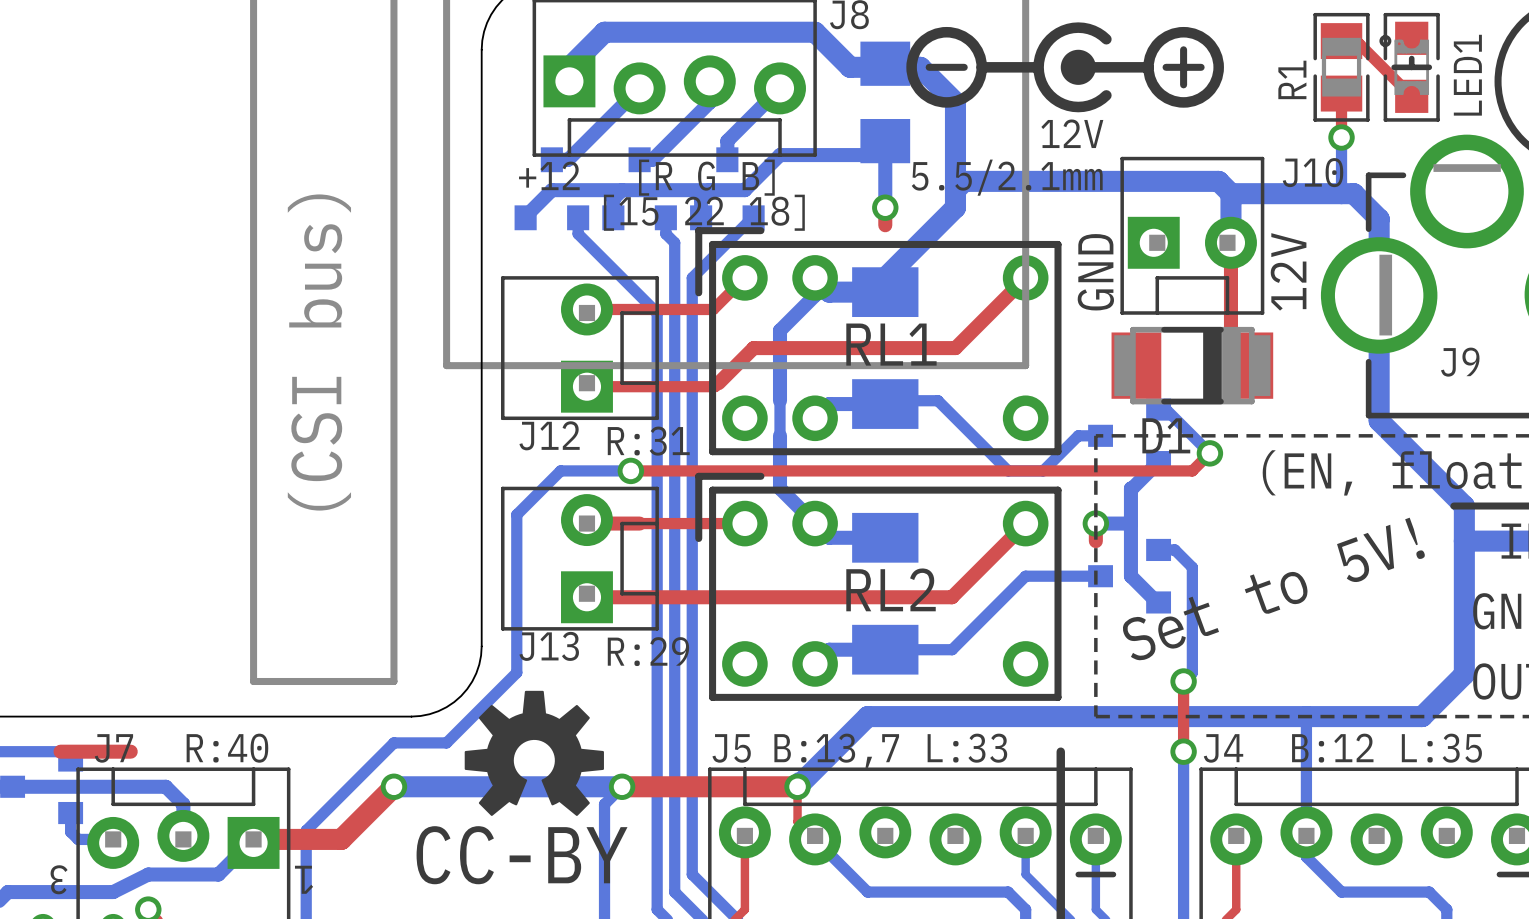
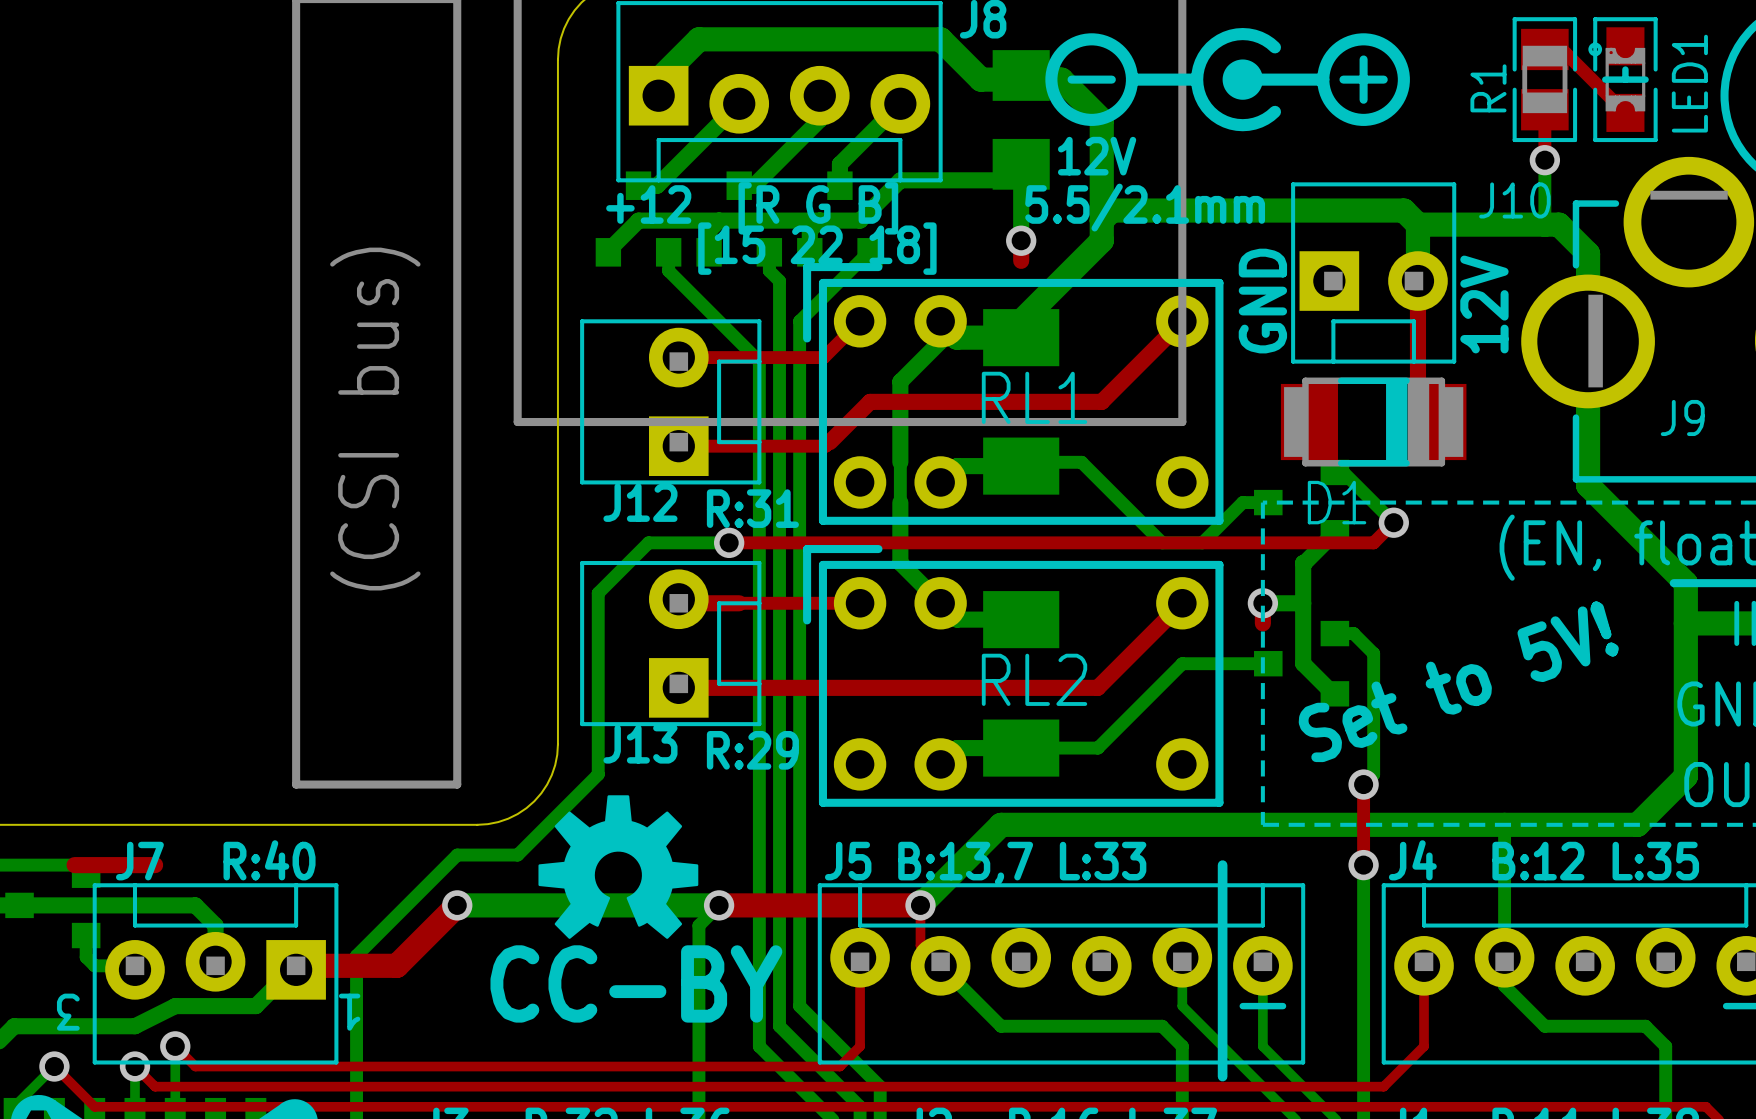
text position: 12V (1072, 133) -> 12V (1097, 156)

